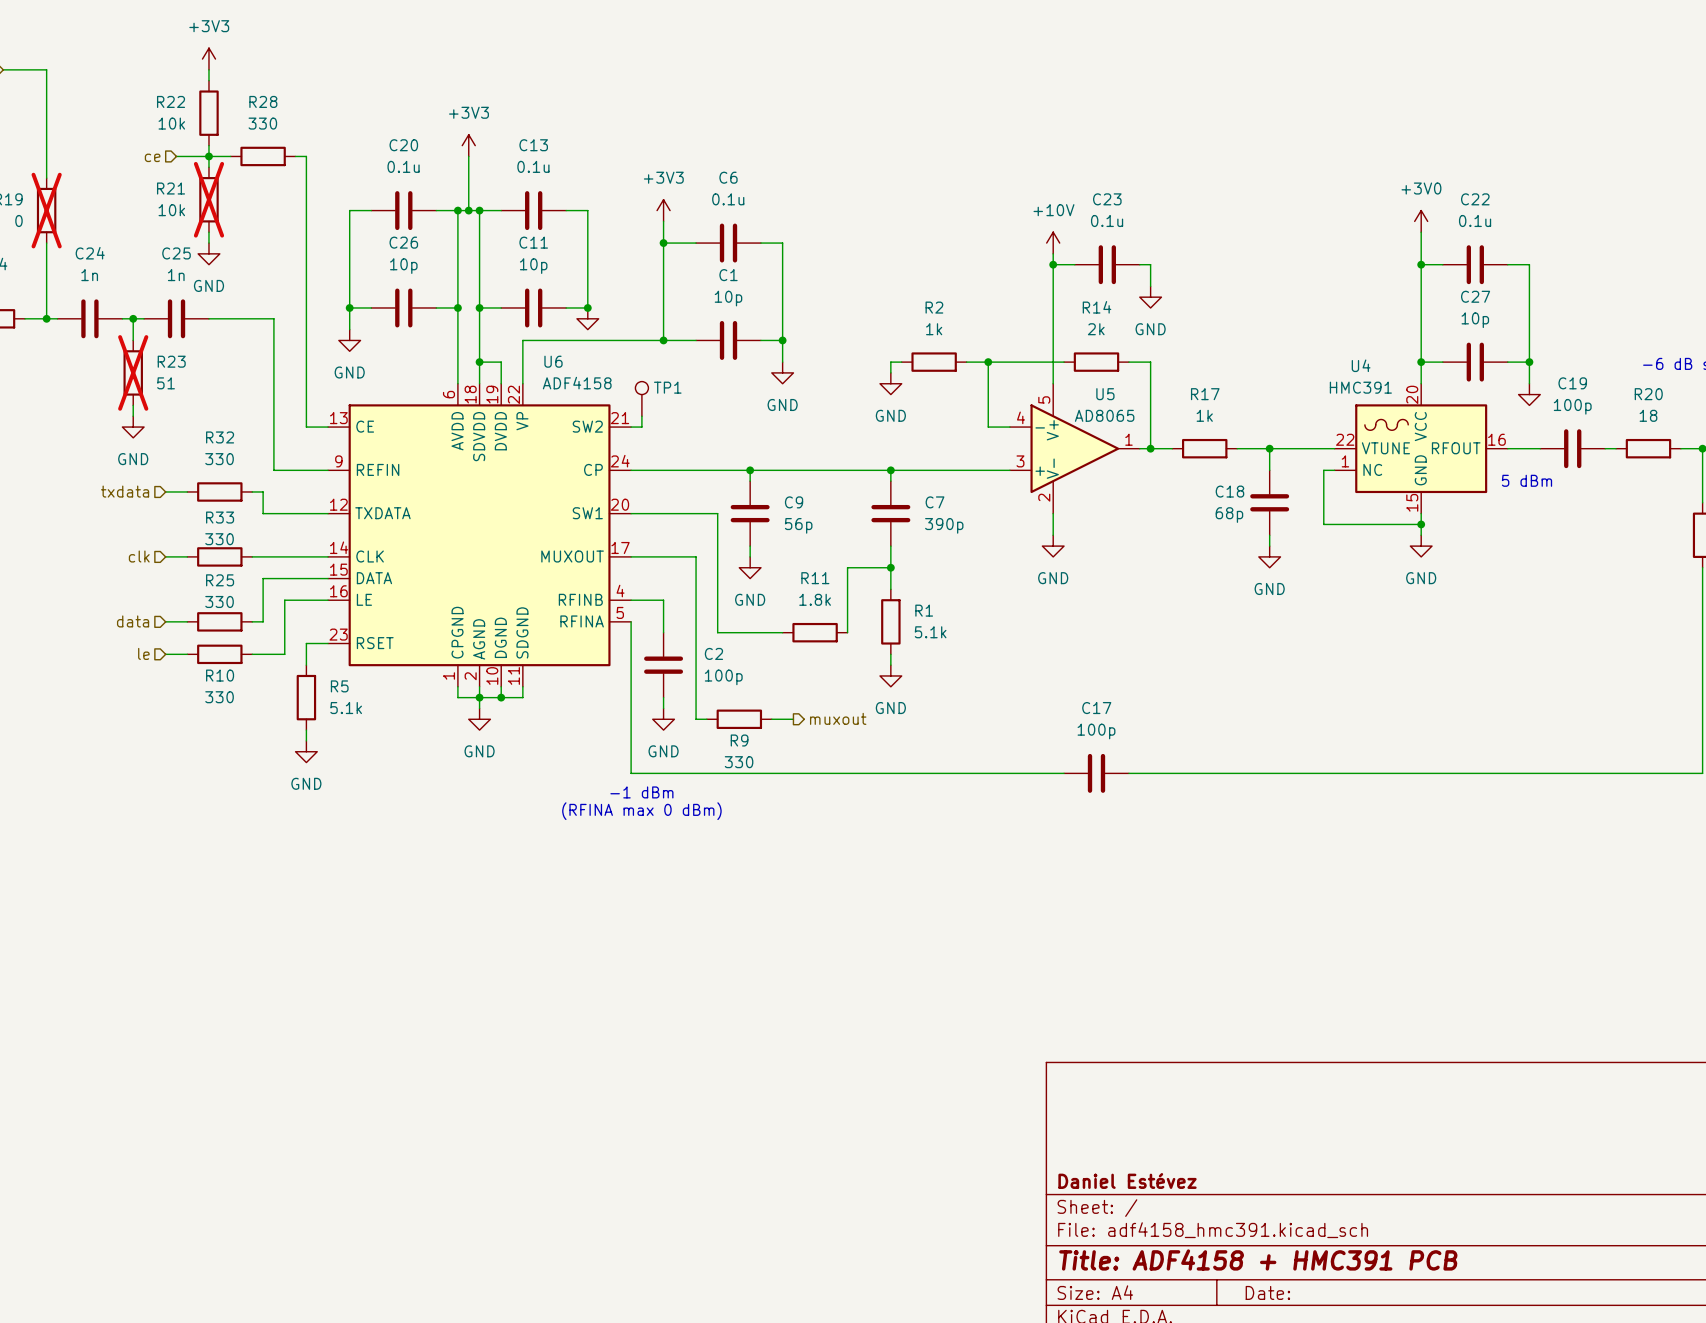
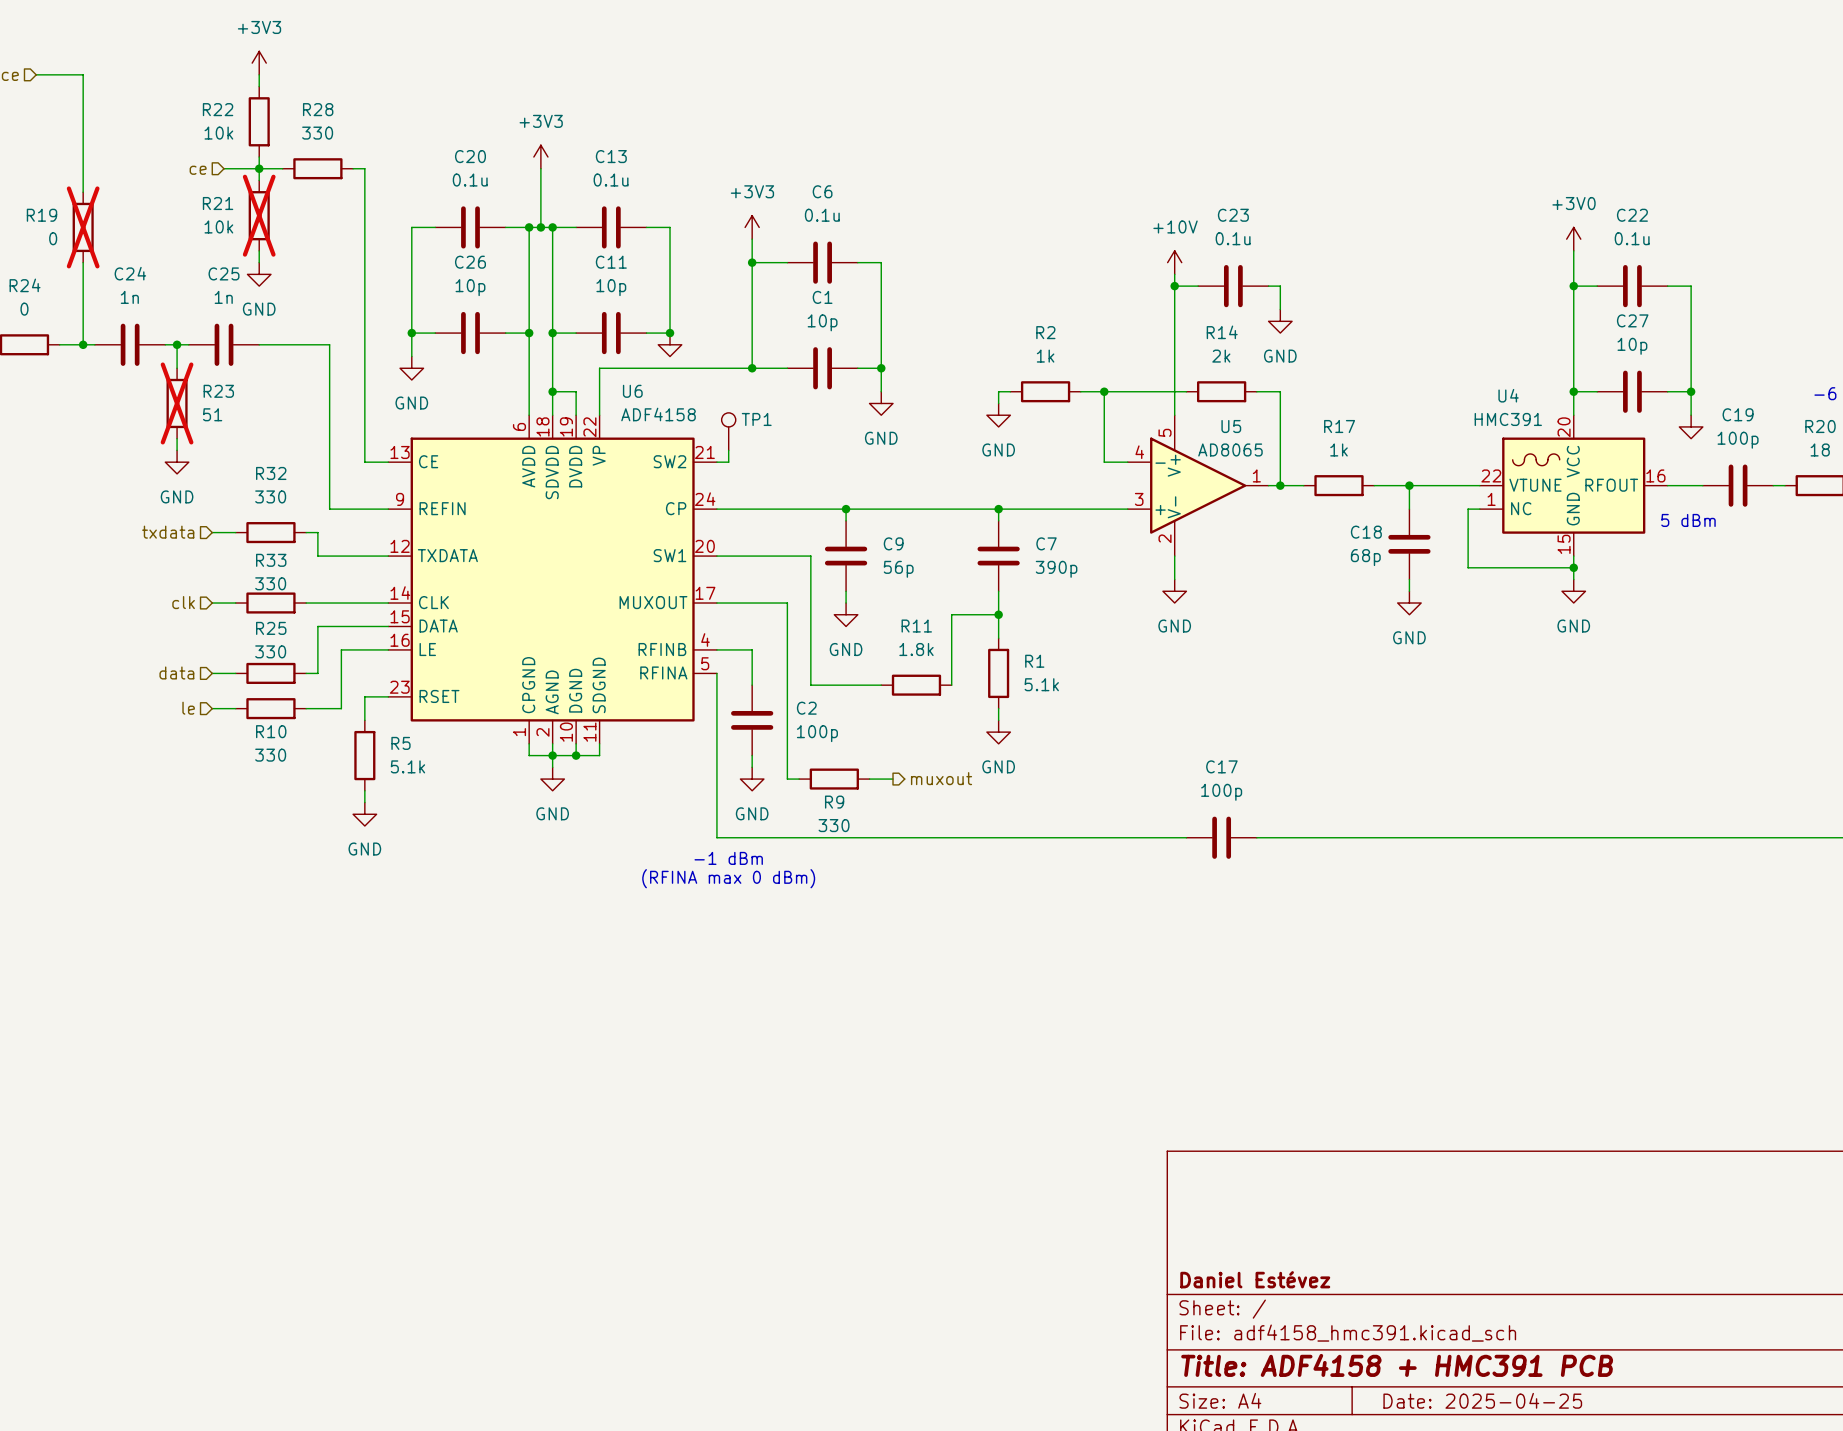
title block: Date: (1267, 1292) -> Date: 2025-04-25 (1482, 1400)

